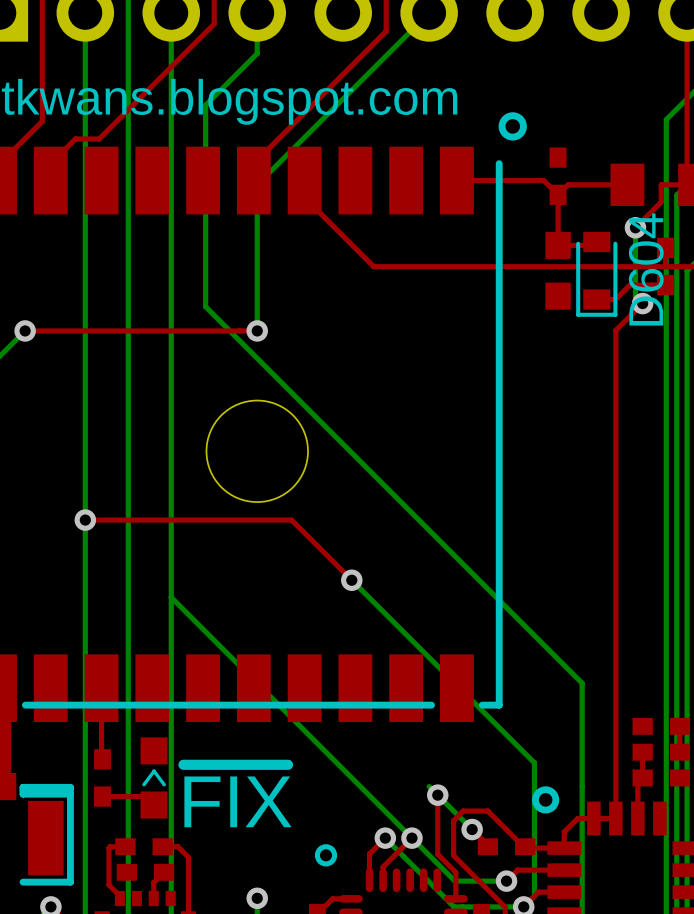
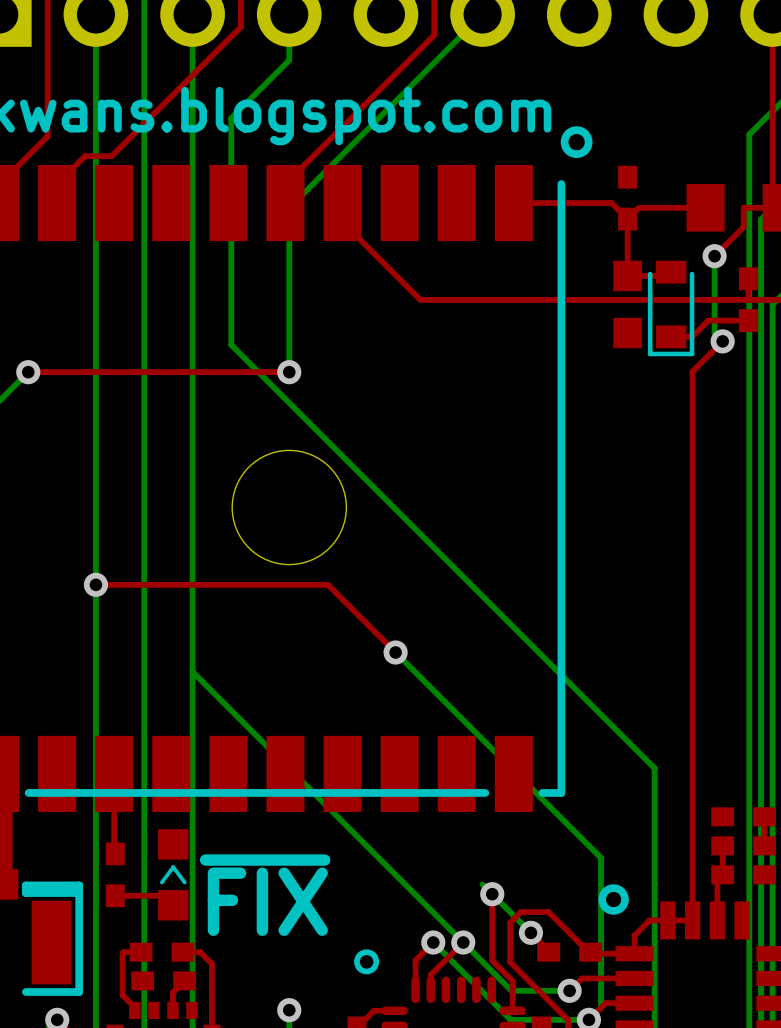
D604 name: D604 (646, 269) -> none

